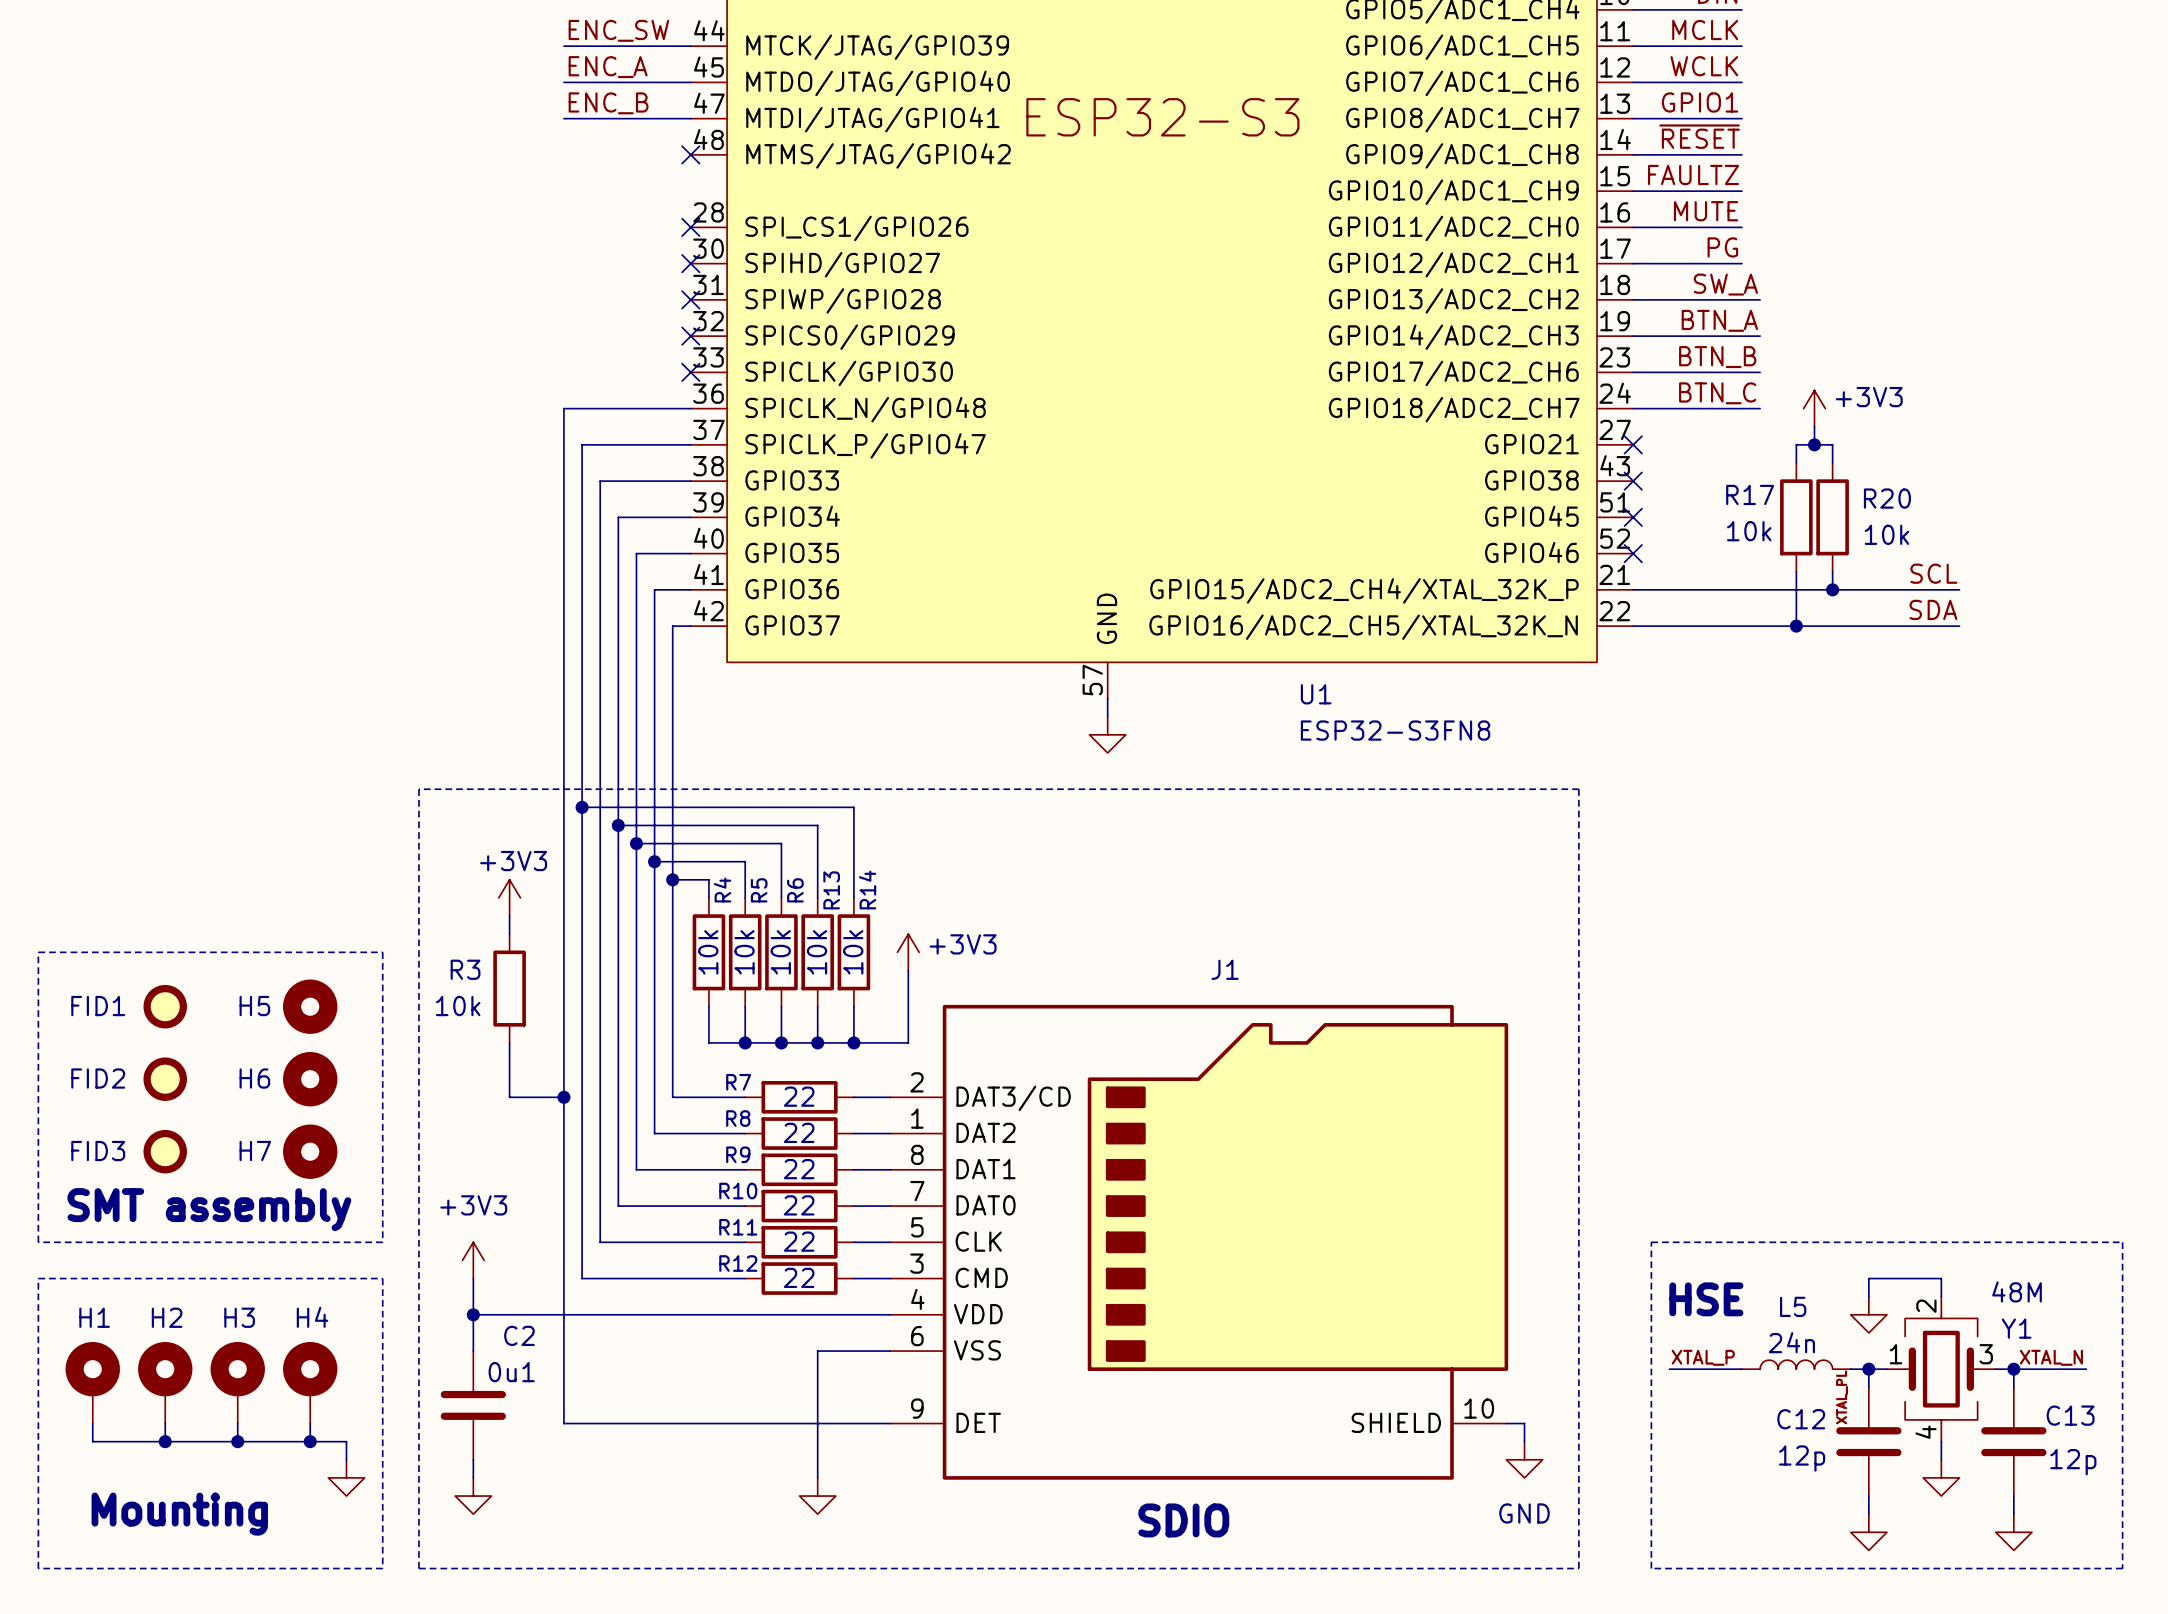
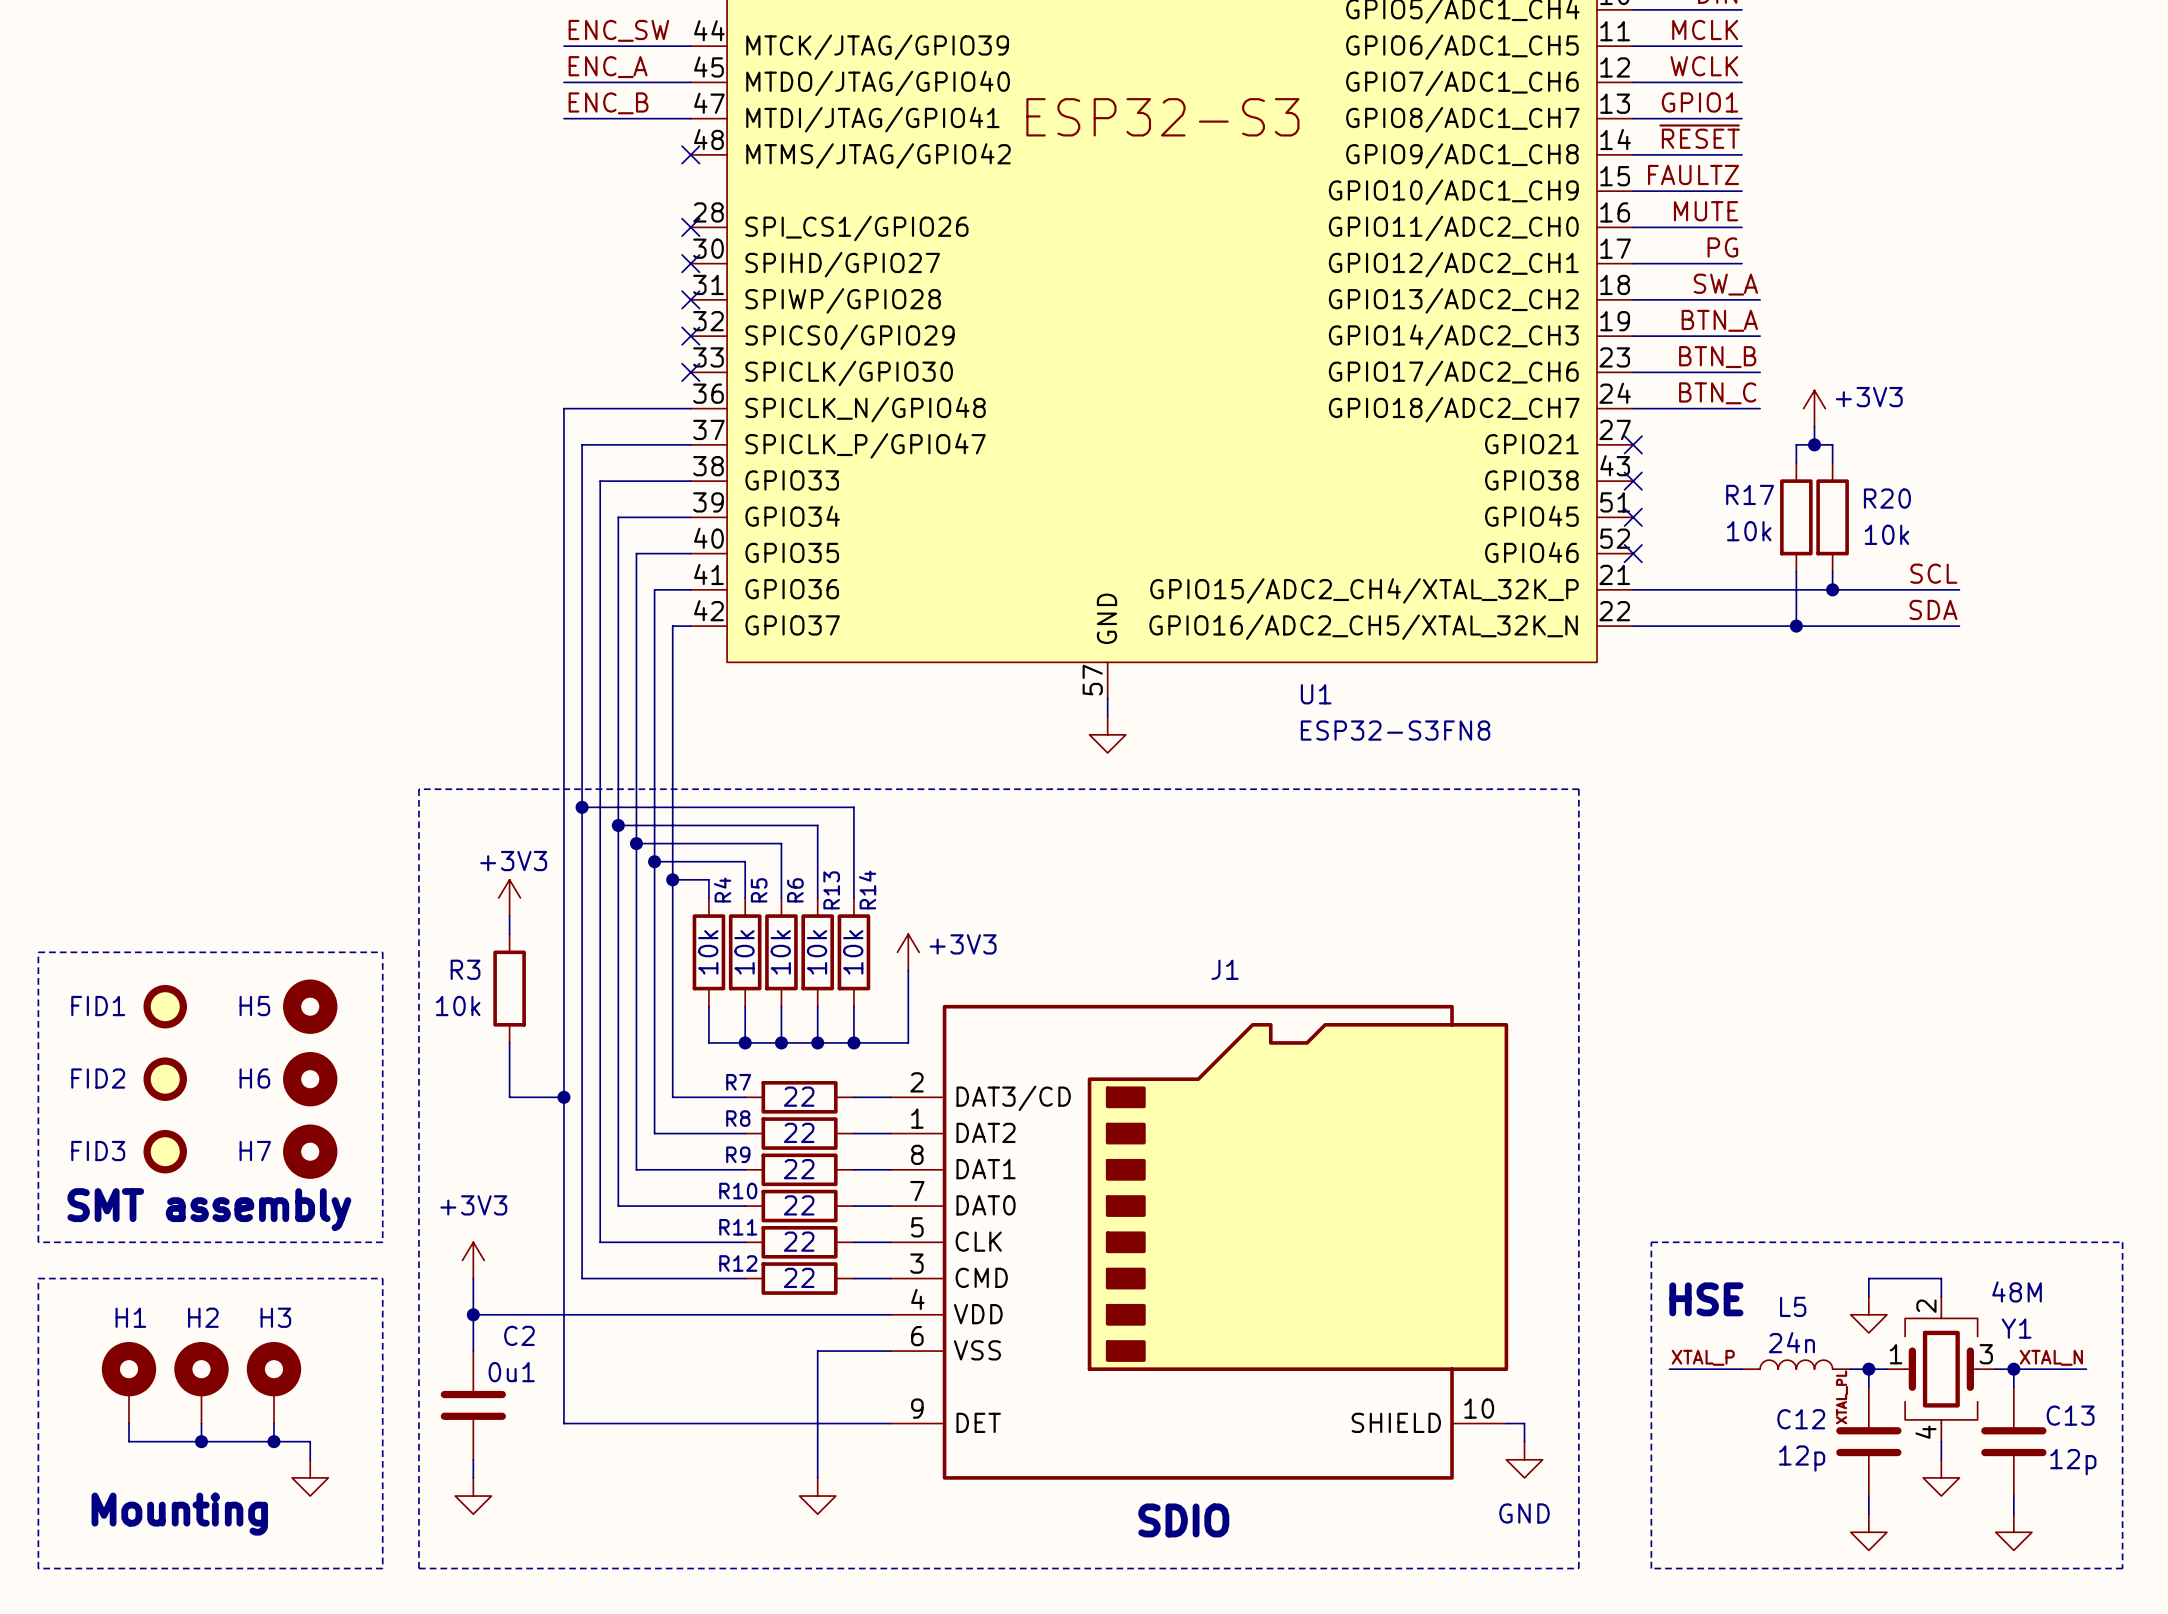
H1 position: (92, 1382) -> (129, 1382)
H2 position: (165, 1382) -> (201, 1382)
H3 position: (237, 1382) -> (273, 1382)
H4: (310, 1382) -> none
wire: (92, 1423) (92, 1441) (129, 1441) -> (129, 1423) (129, 1441)
wire: (165, 1423) (165, 1441) -> (273, 1423) (273, 1441)
wire: (237, 1423) (237, 1441) -> (201, 1423) (201, 1441)
wire: (310, 1423) (310, 1441) (346, 1441) (346, 1459) -> none
junction: (165, 1441) -> none
junction: none -> (201, 1441)
junction: (237, 1441) -> none
junction: none -> (273, 1441)
wire: none -> (310, 1441) (310, 1459)
junction: (310, 1441) -> none
power symbol position: (346, 1477) -> (310, 1477)

